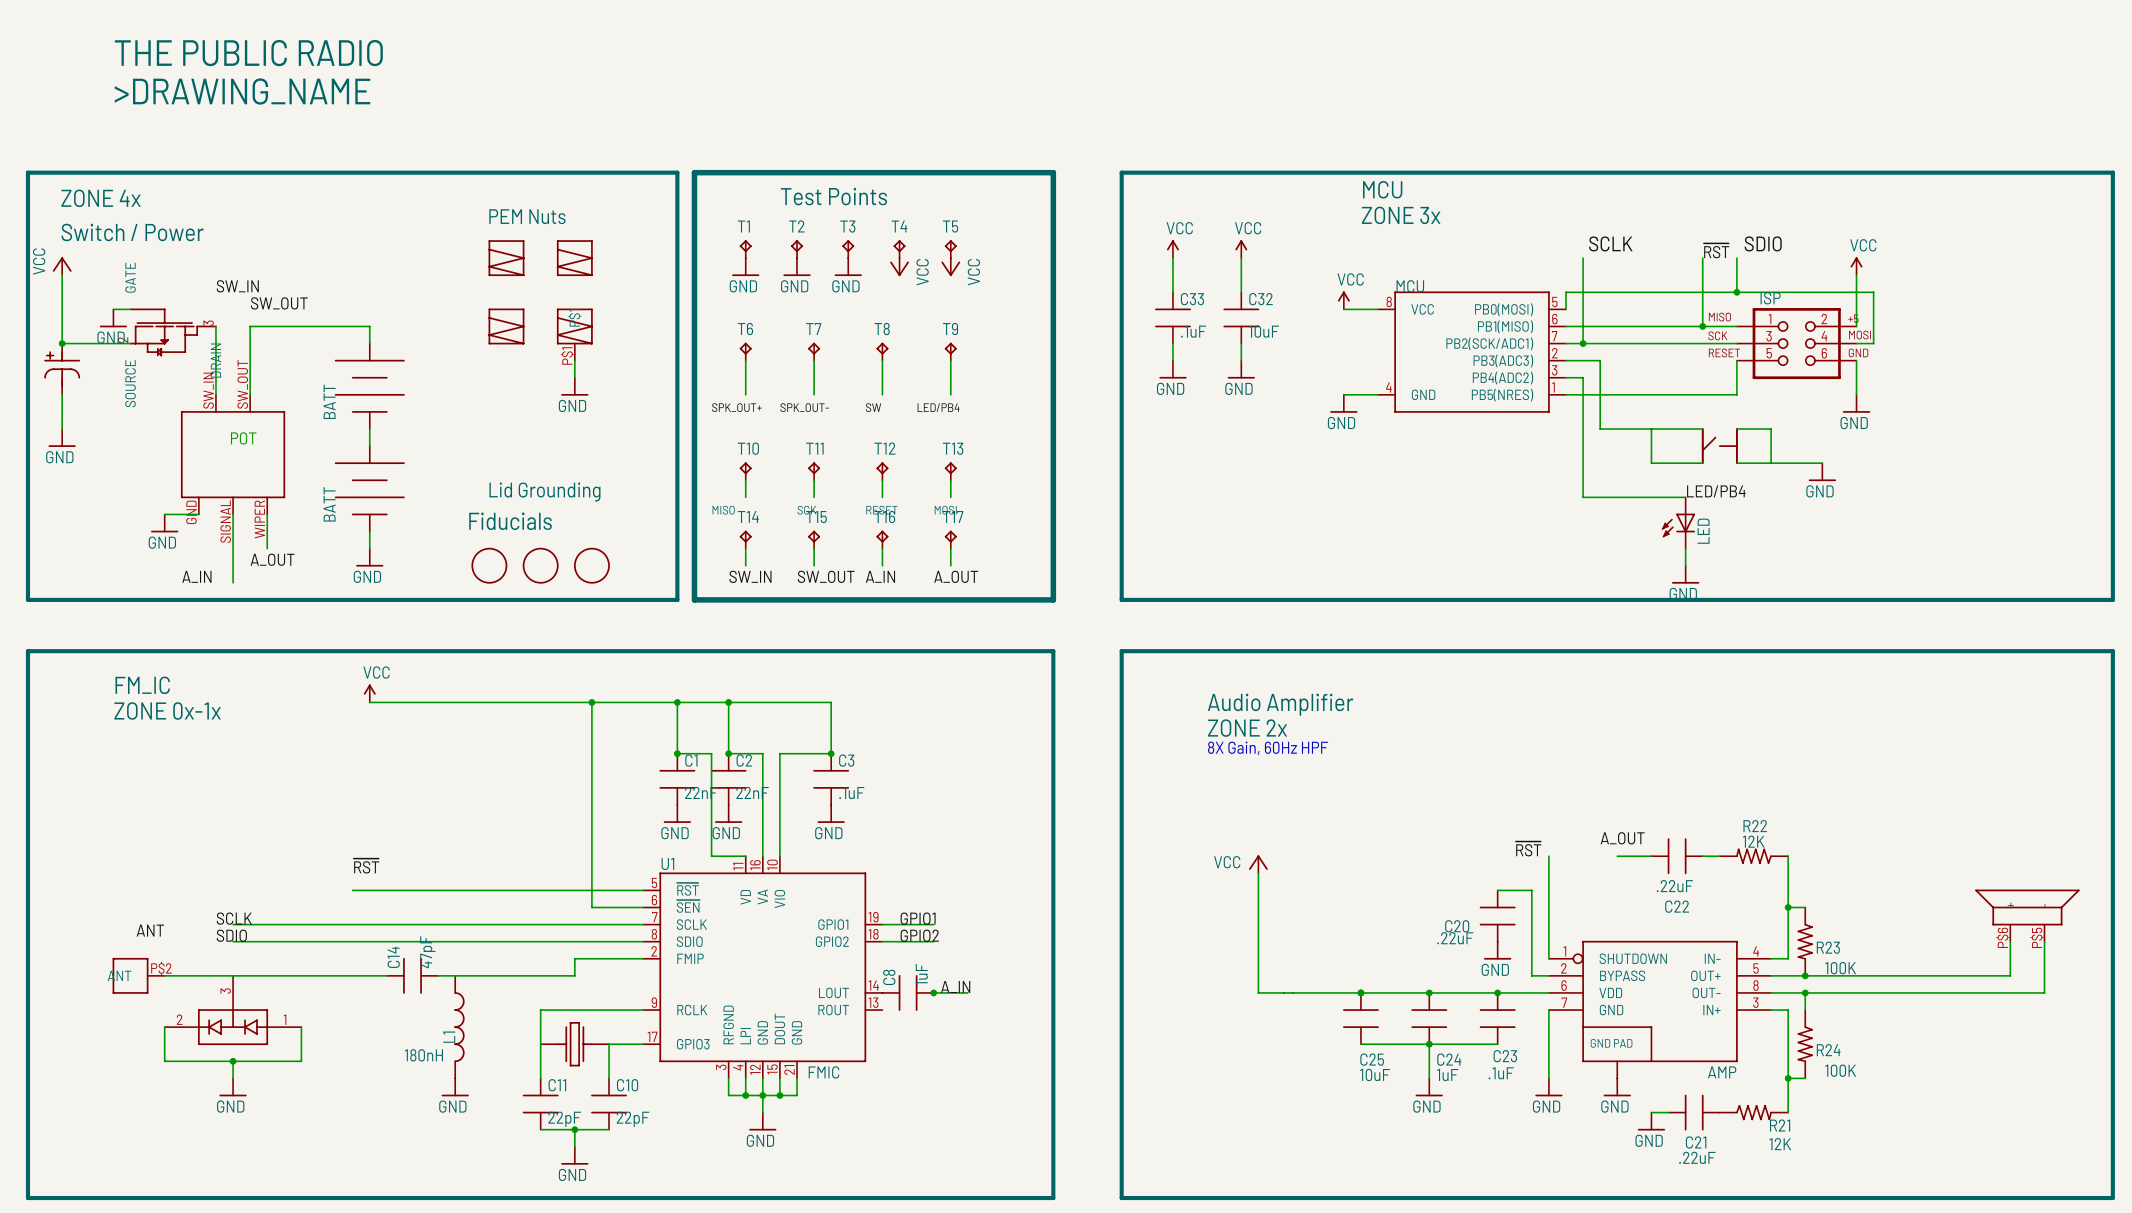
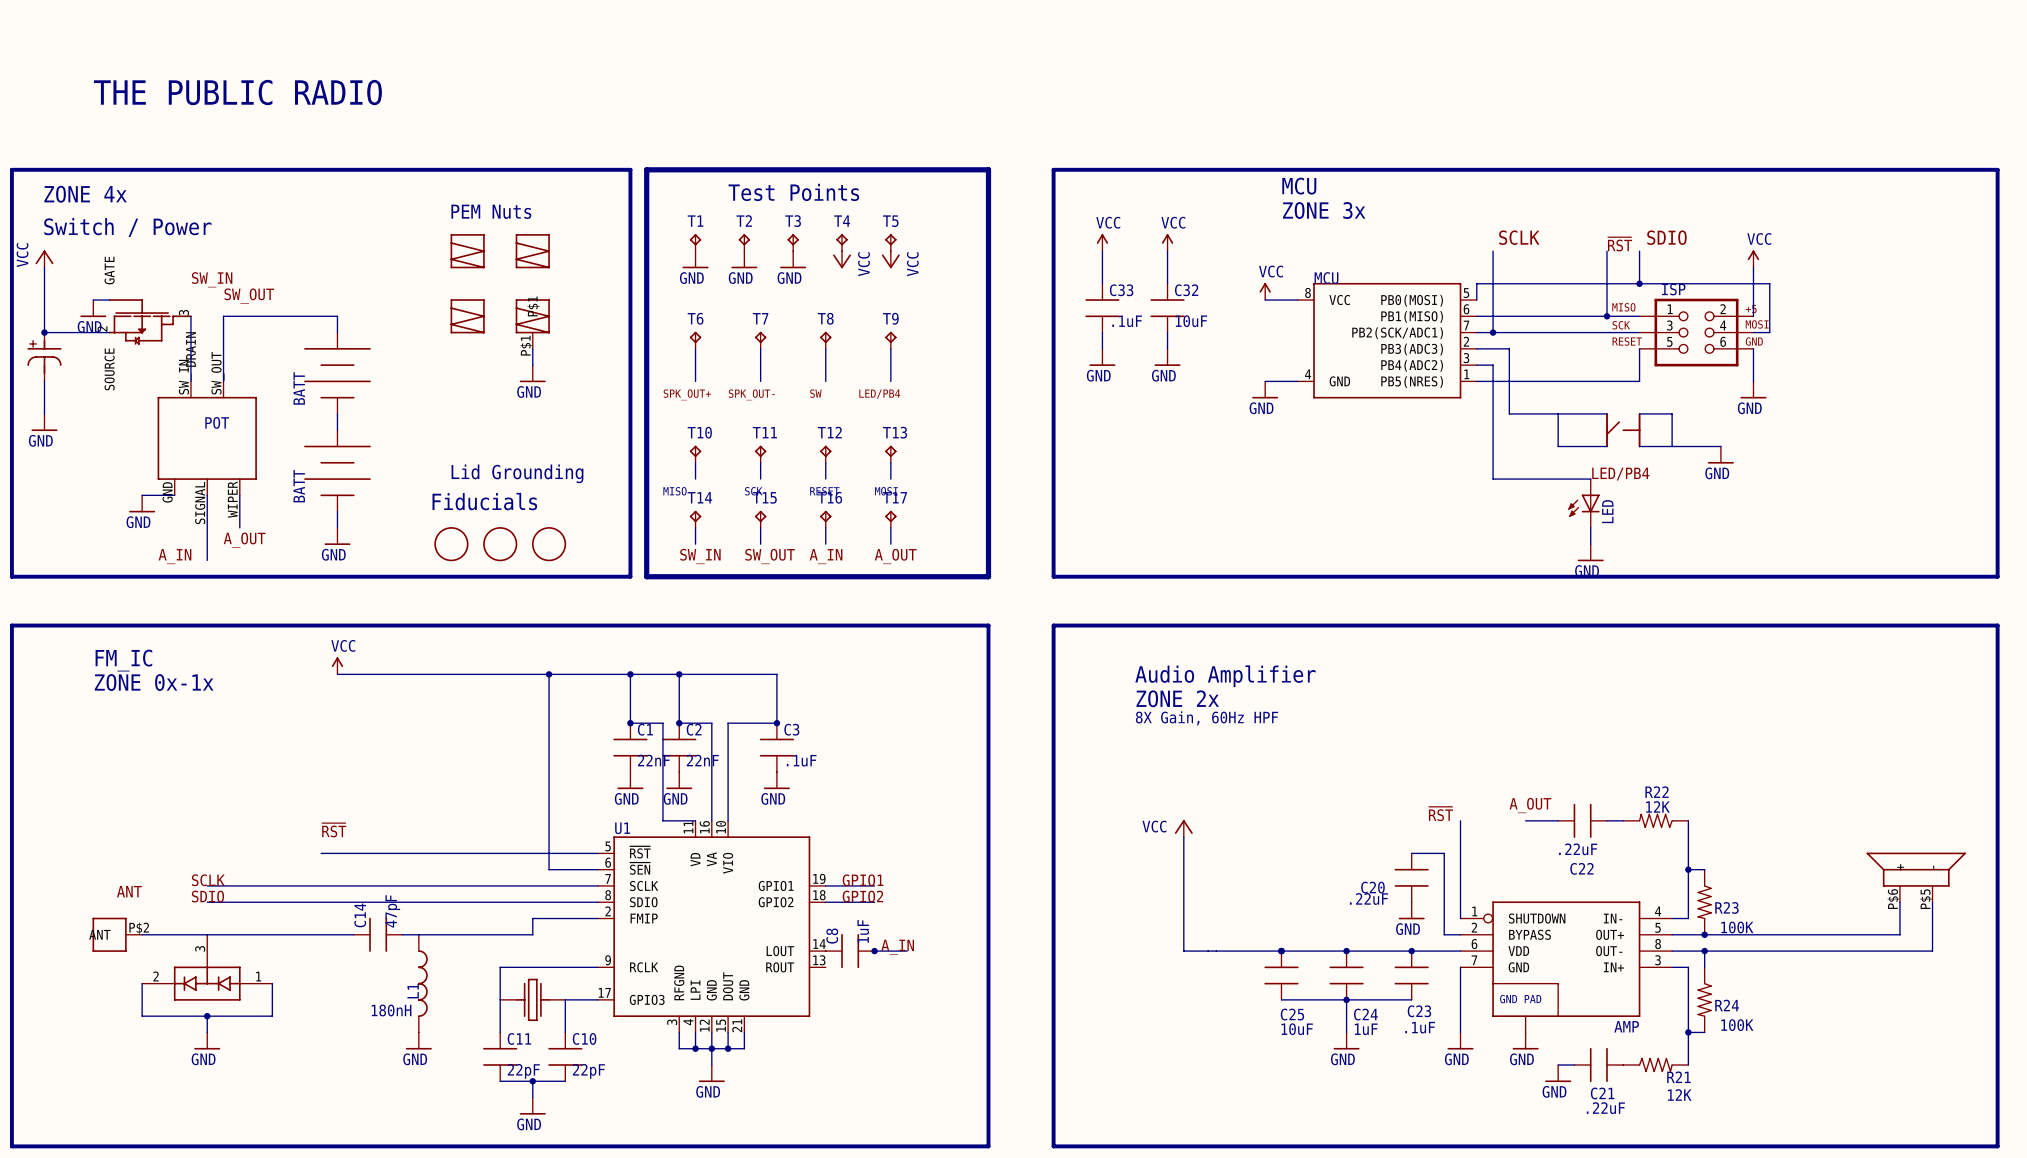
text: THE PUBLIC RADIO (248, 53) -> none
text: >DRAWING_NAME (242, 91) -> THE PUBLIC RADIO (237, 92)
U1 value: FMIC (824, 1072) -> none

